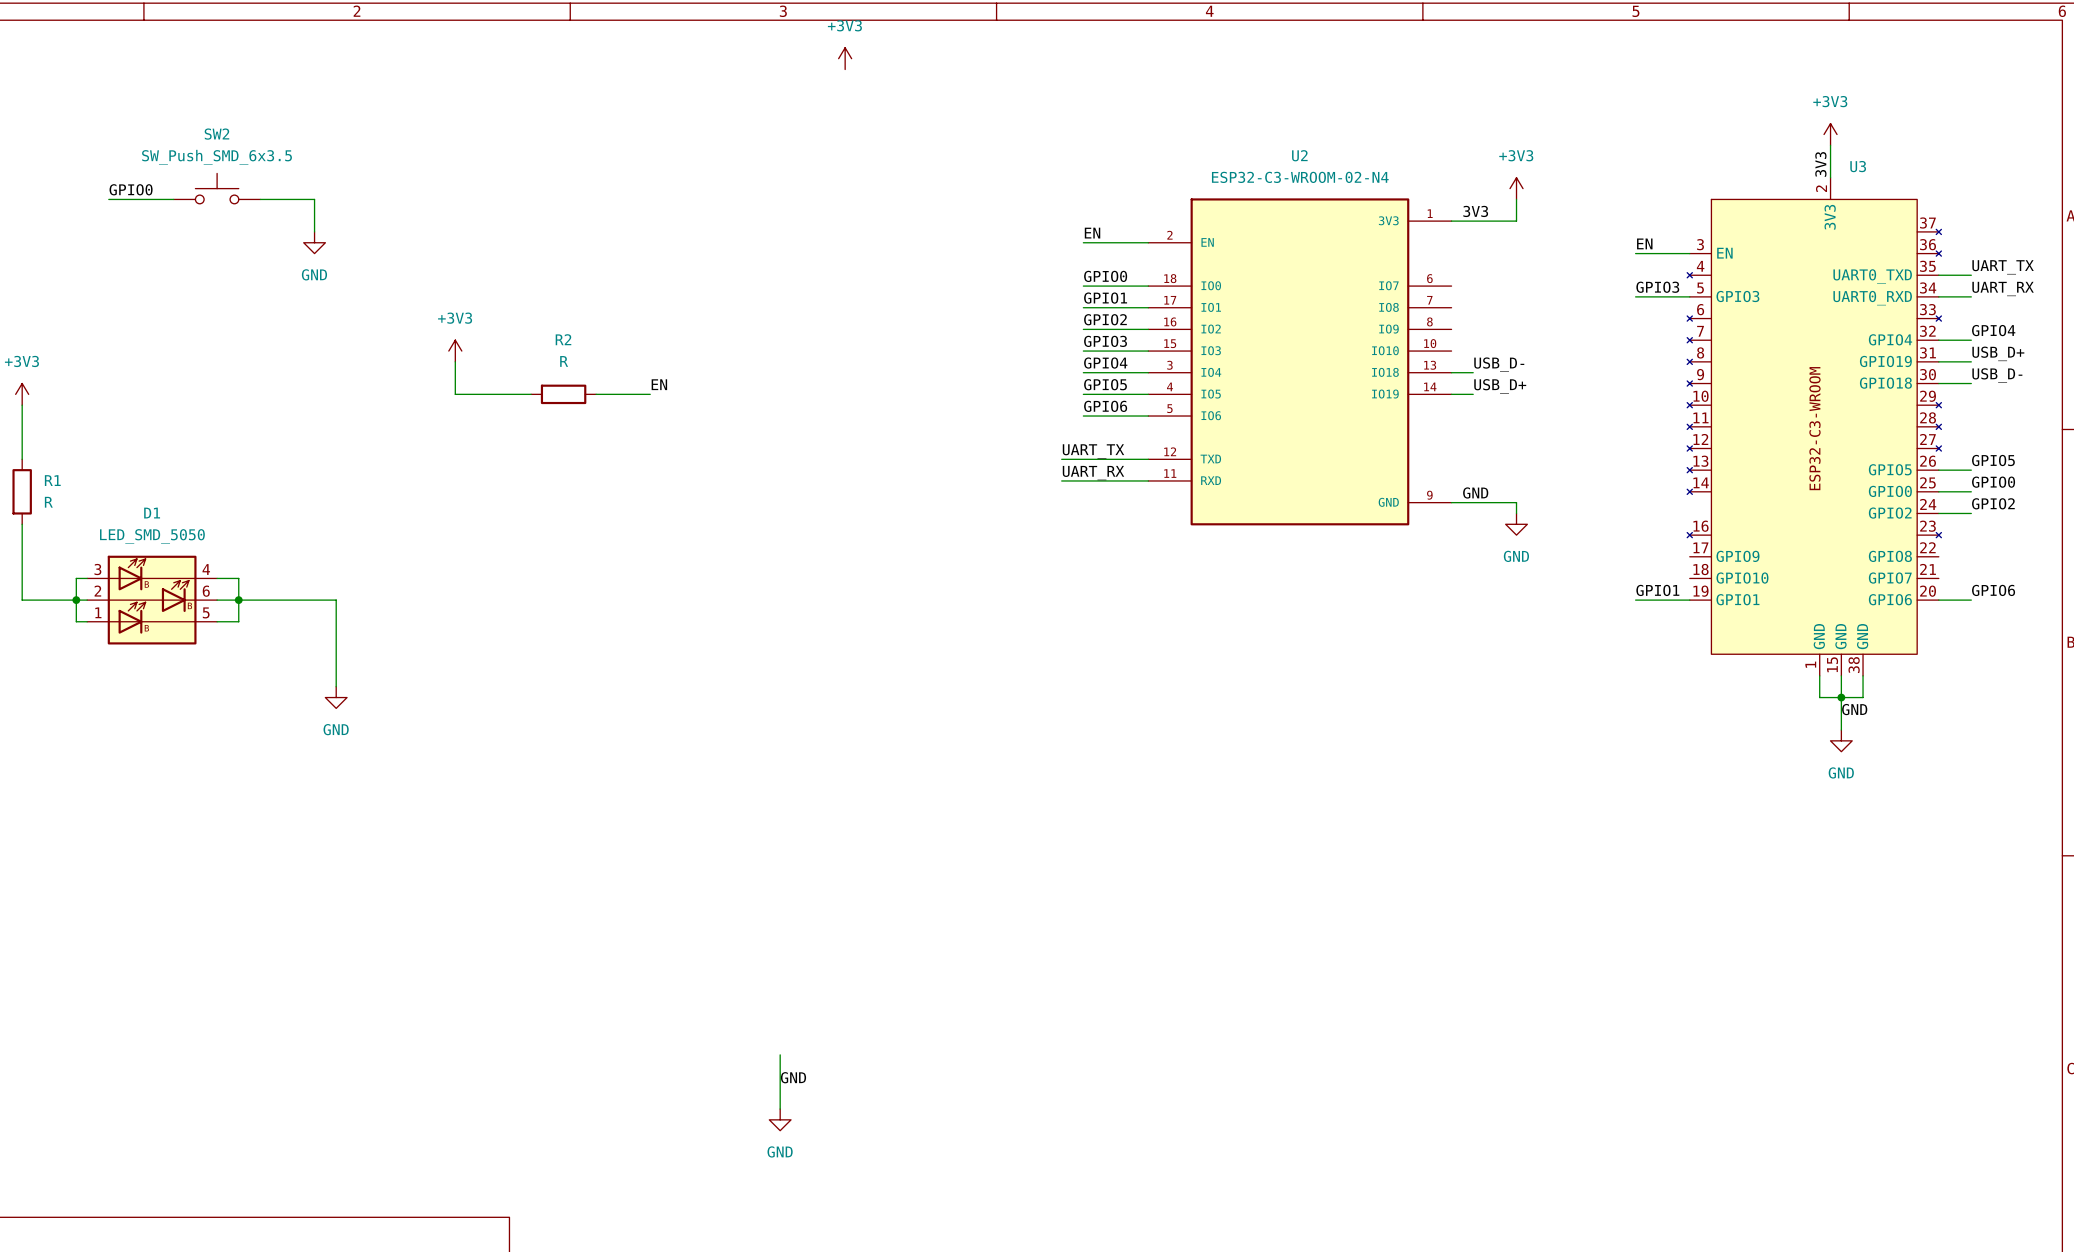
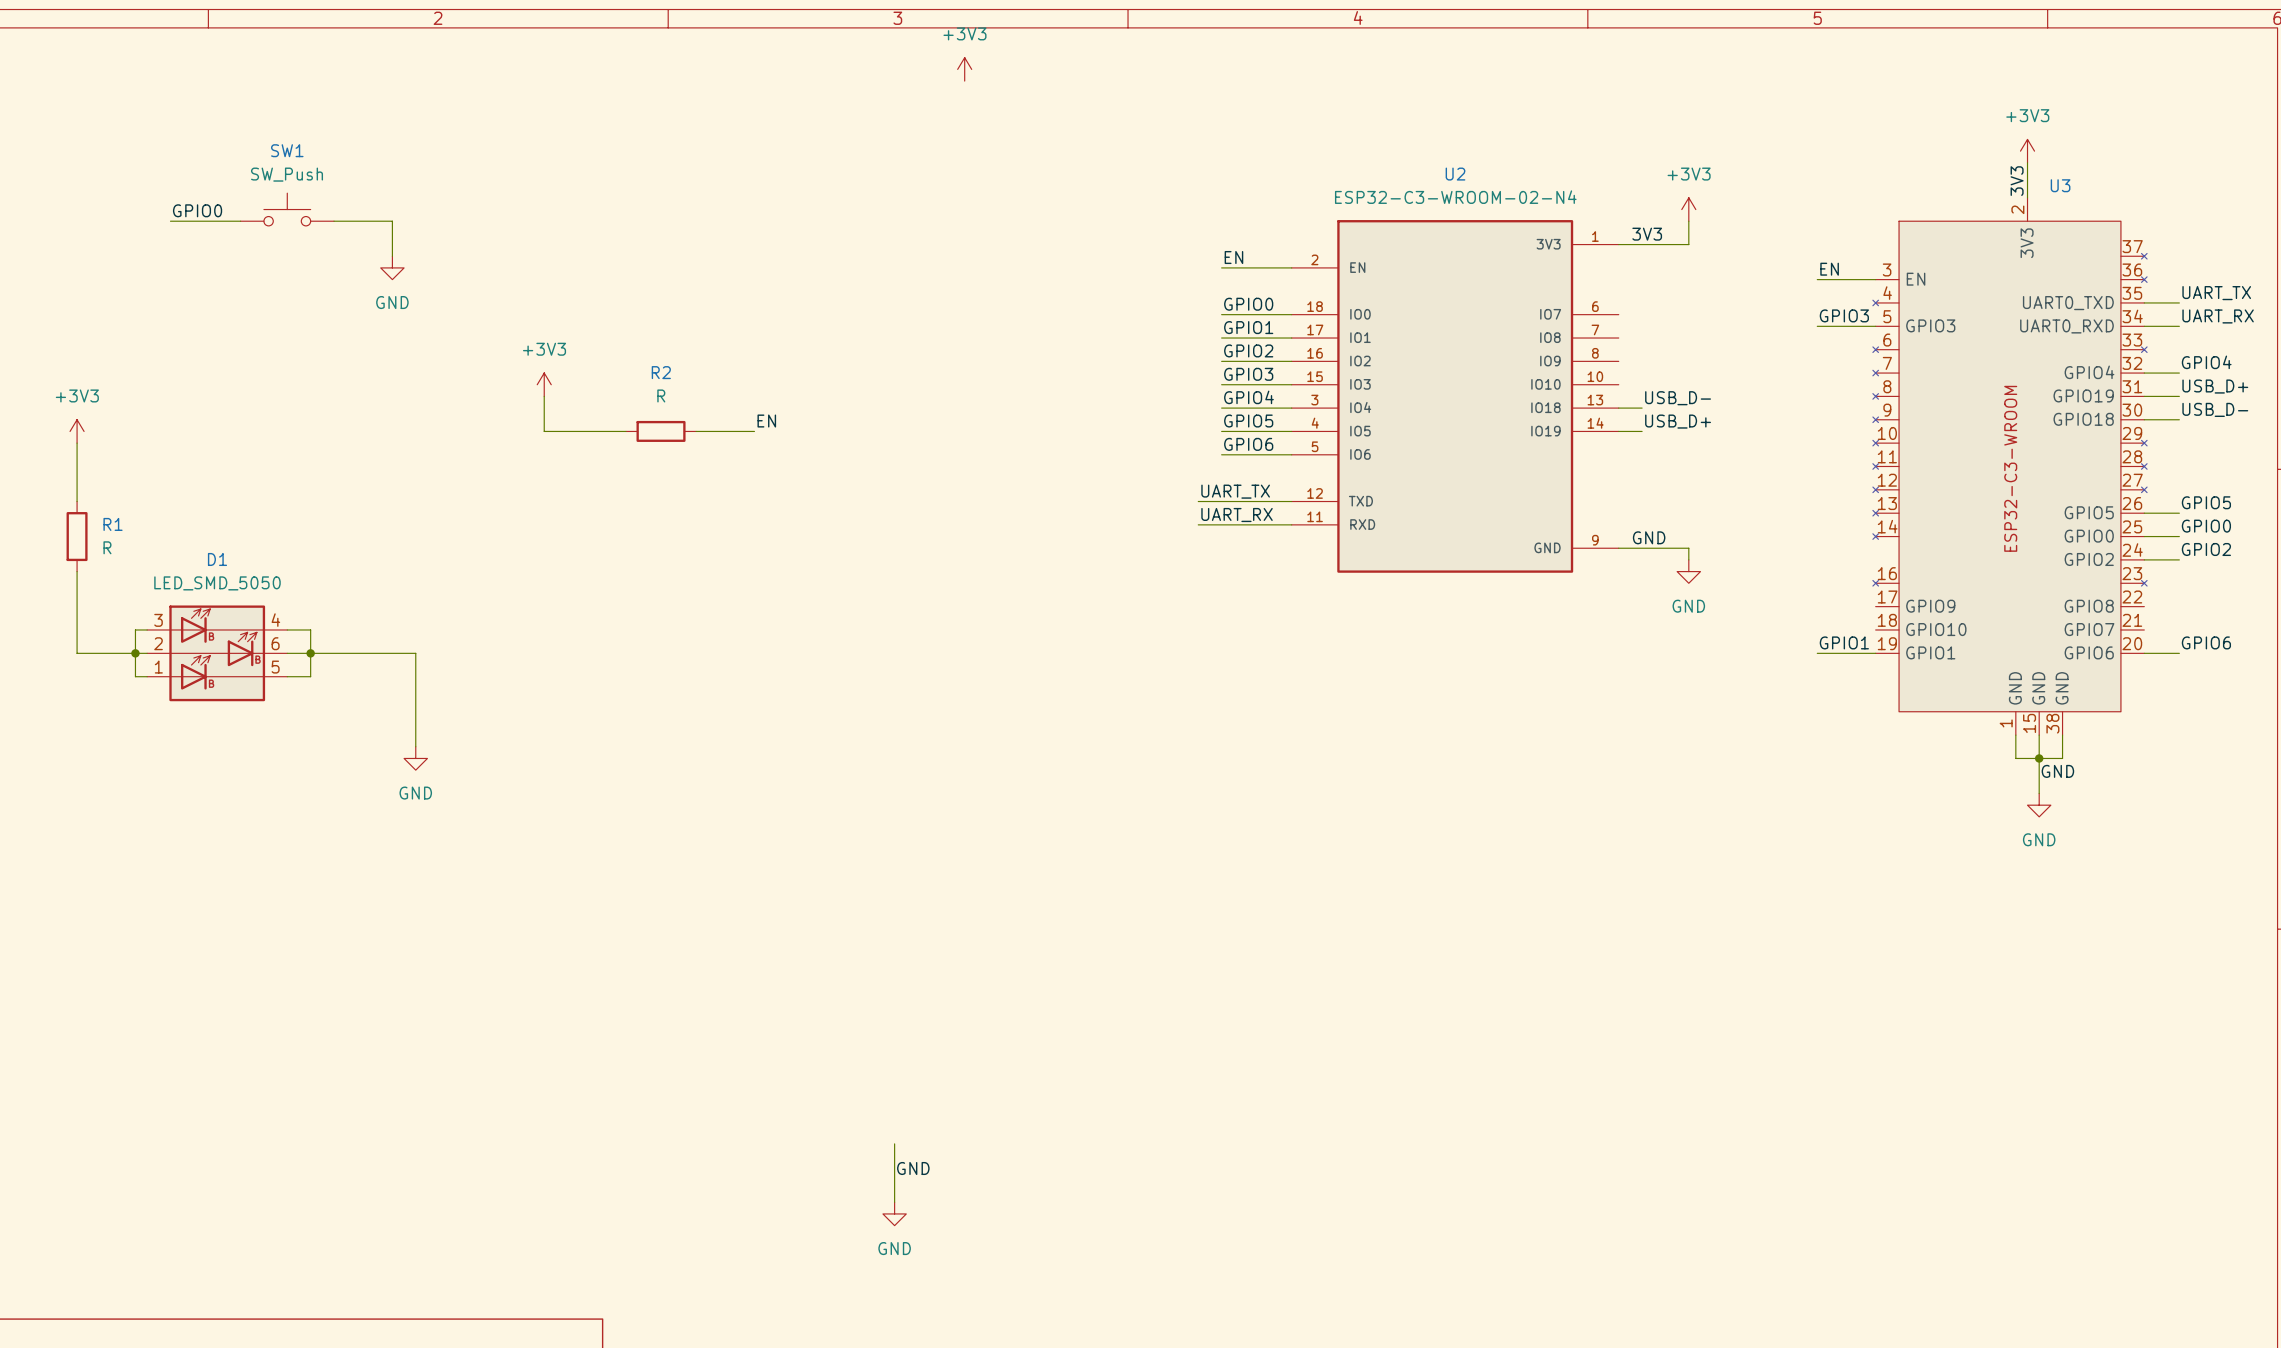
SW2 name: SW2 (216, 134) -> SW1 (287, 150)
SW2 value: SW_Push_SMD_6x3.5 (217, 157) -> SW_Push (287, 174)

